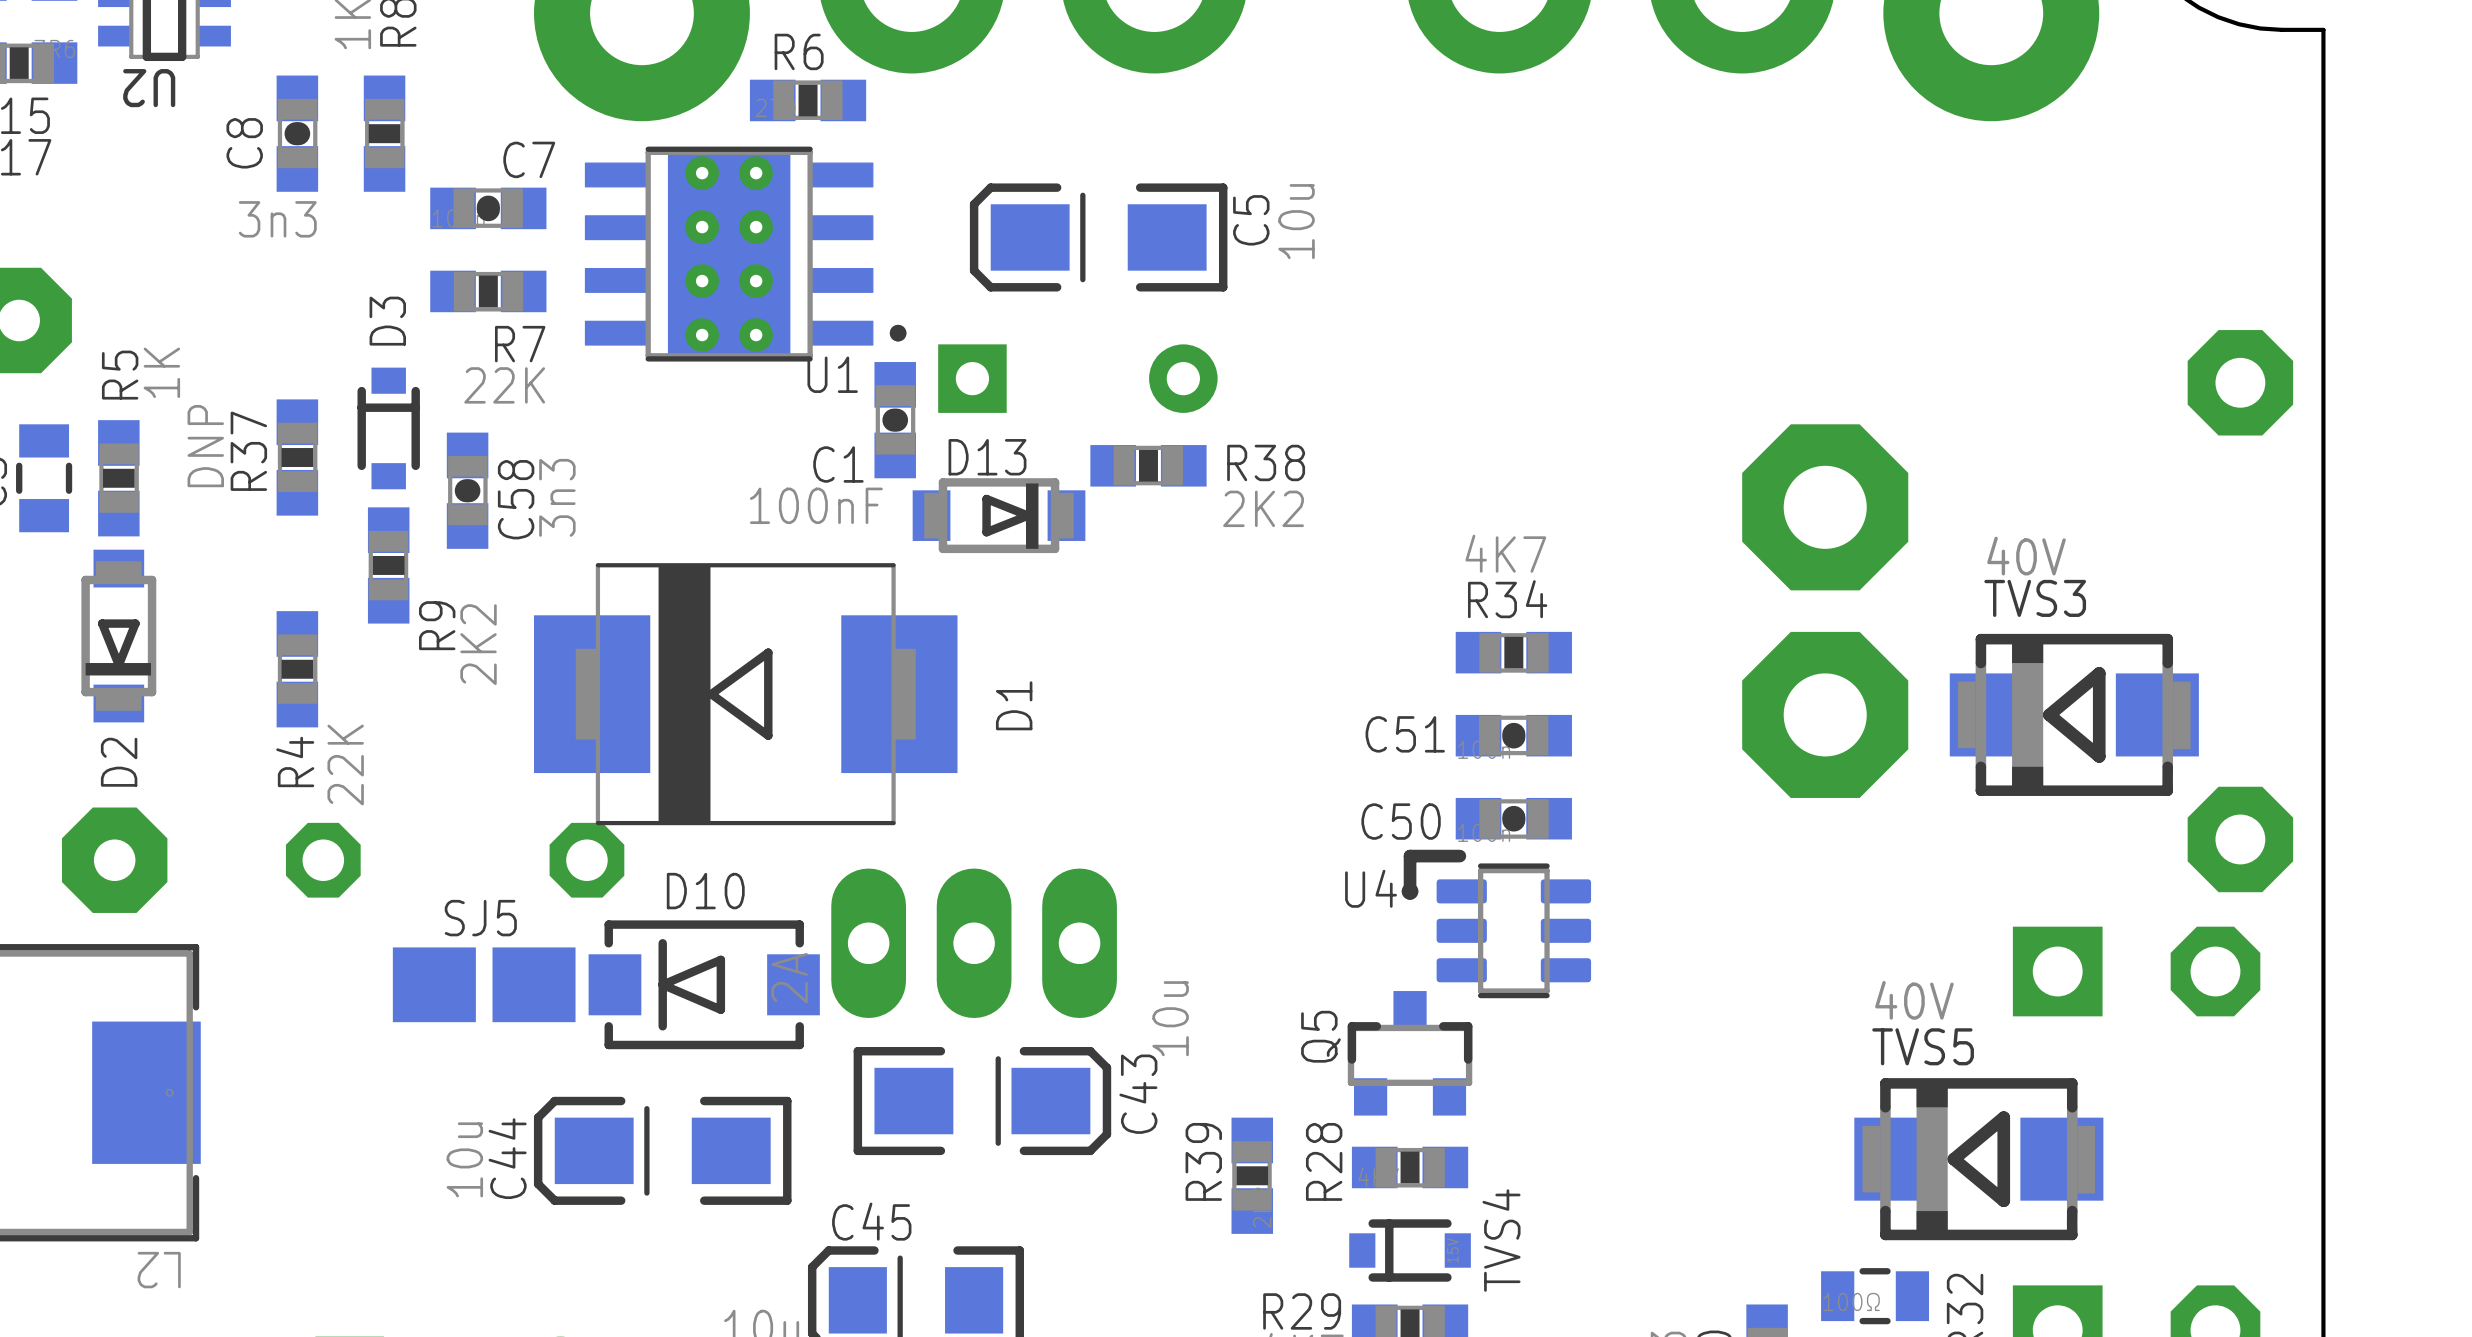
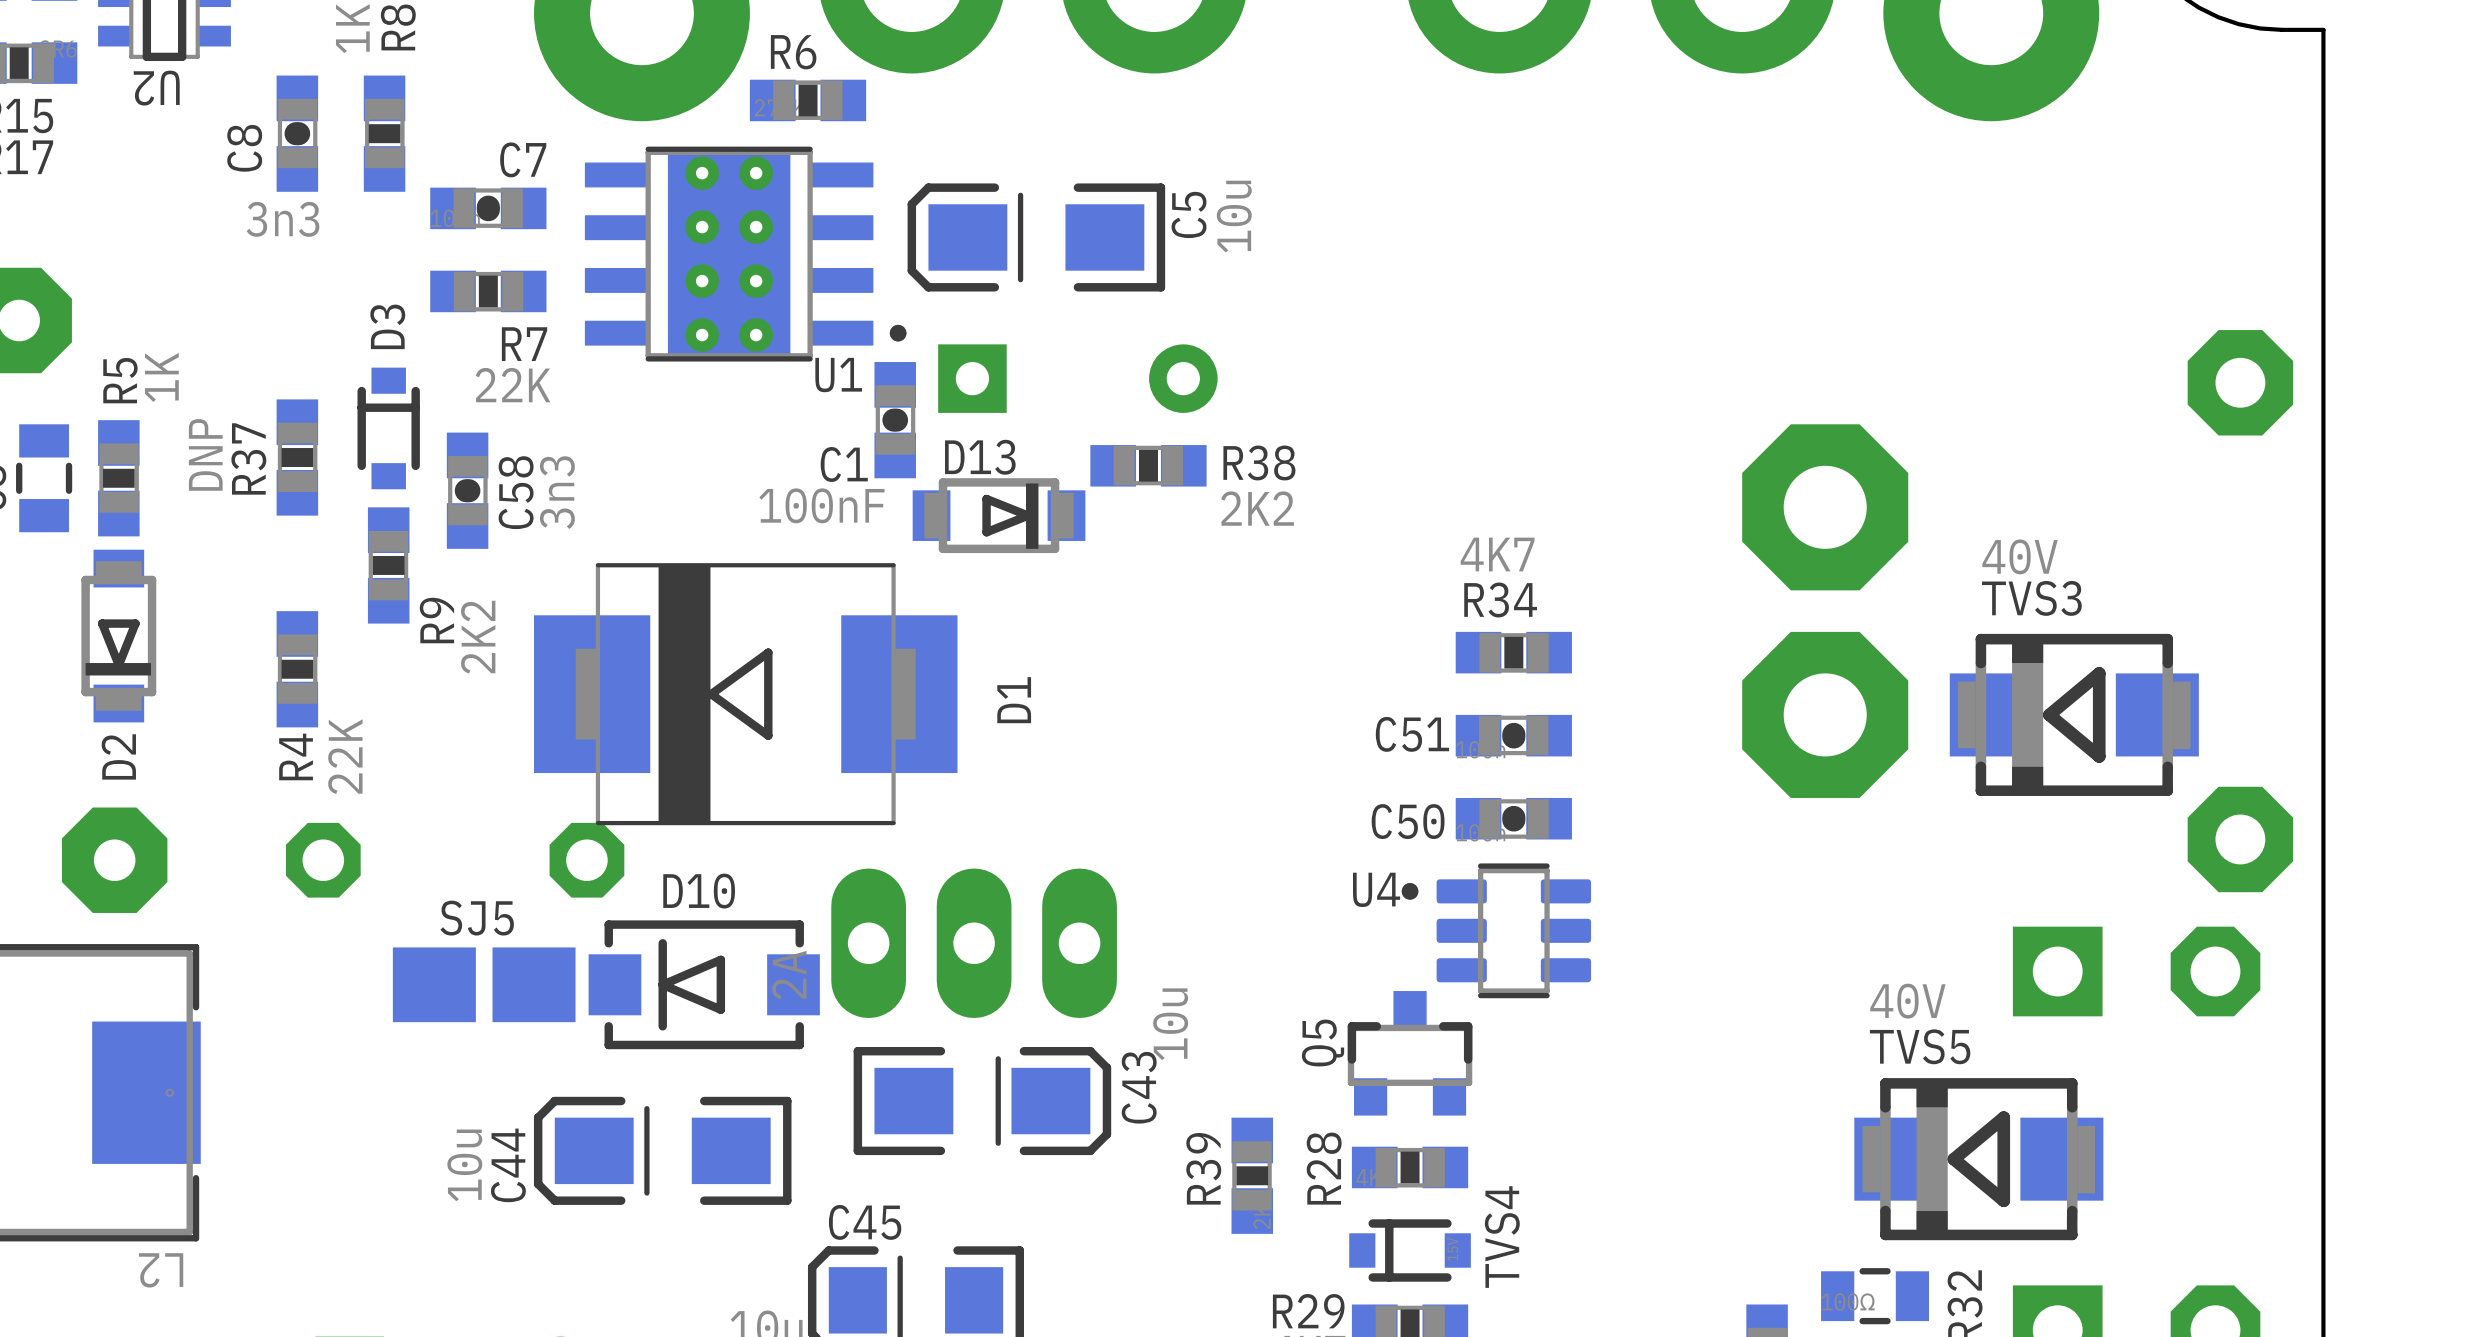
C5 position: (1098, 237) -> (1036, 237)
U4 footprint: [1401, 849, 1592, 999] -> [1401, 863, 1592, 999]

